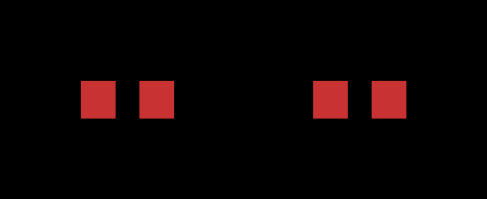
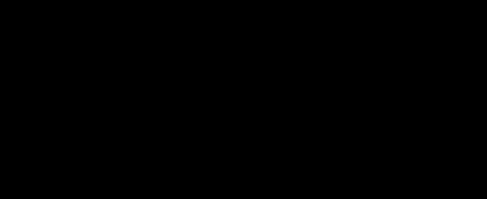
part: (127, 99) -> none
part: (359, 99) -> none

